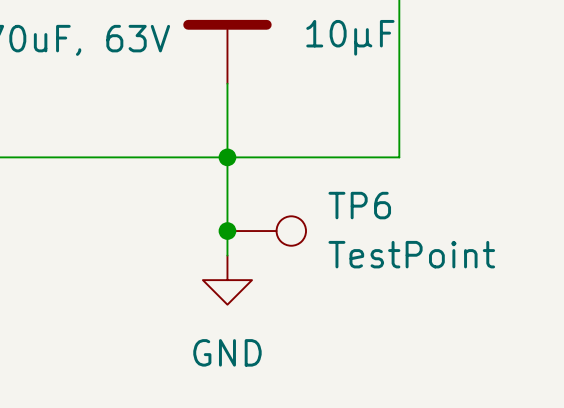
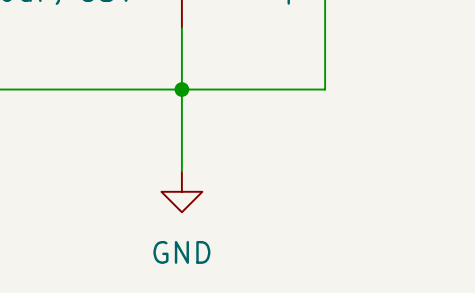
junction: (227, 231) -> none
TP6: TestPoint (266, 231) -> none

